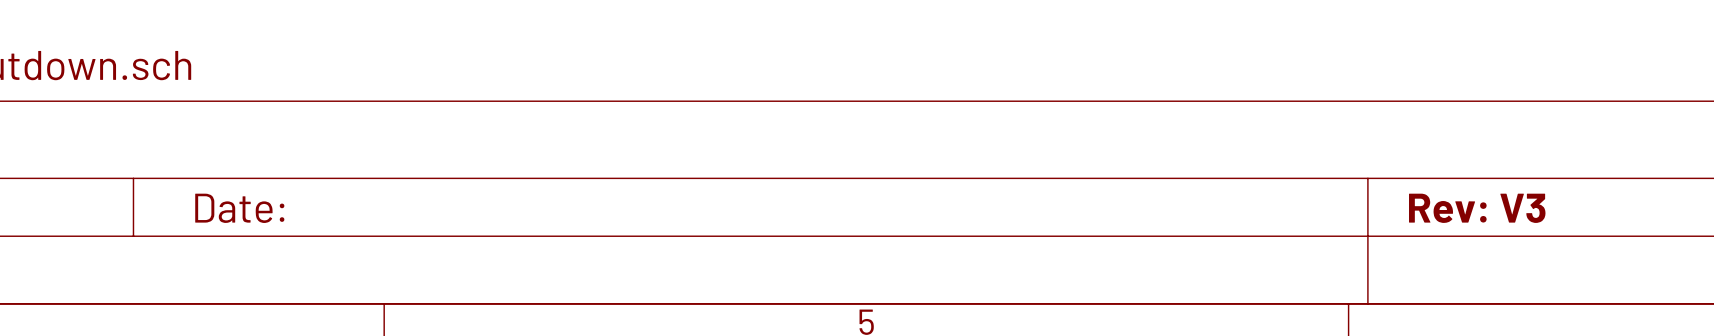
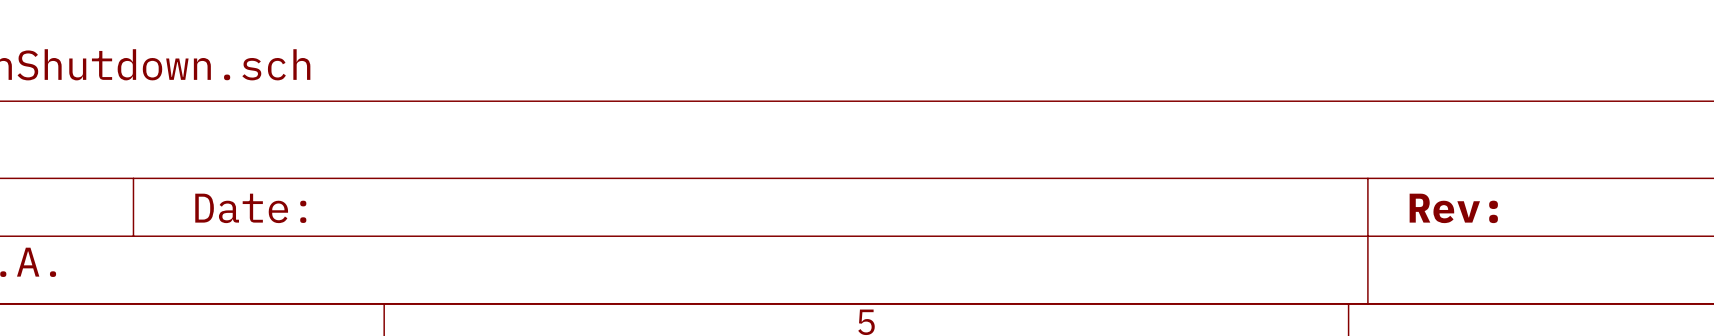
title block: Rev: V3 (1477, 208) -> Rev: (1453, 208)

